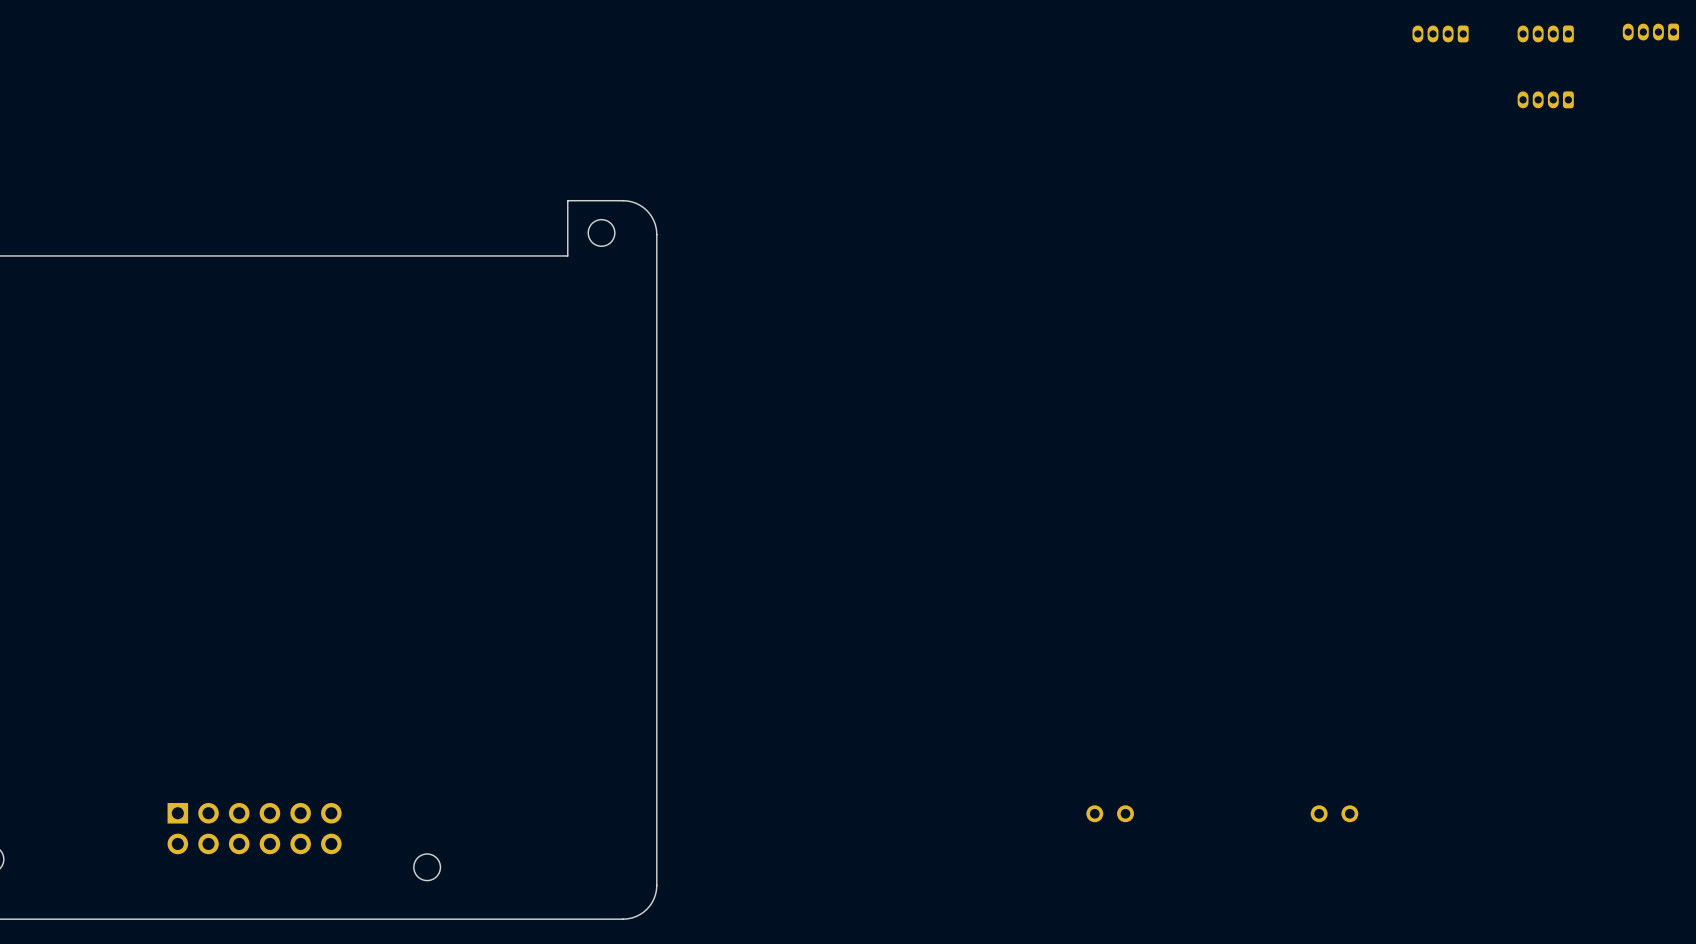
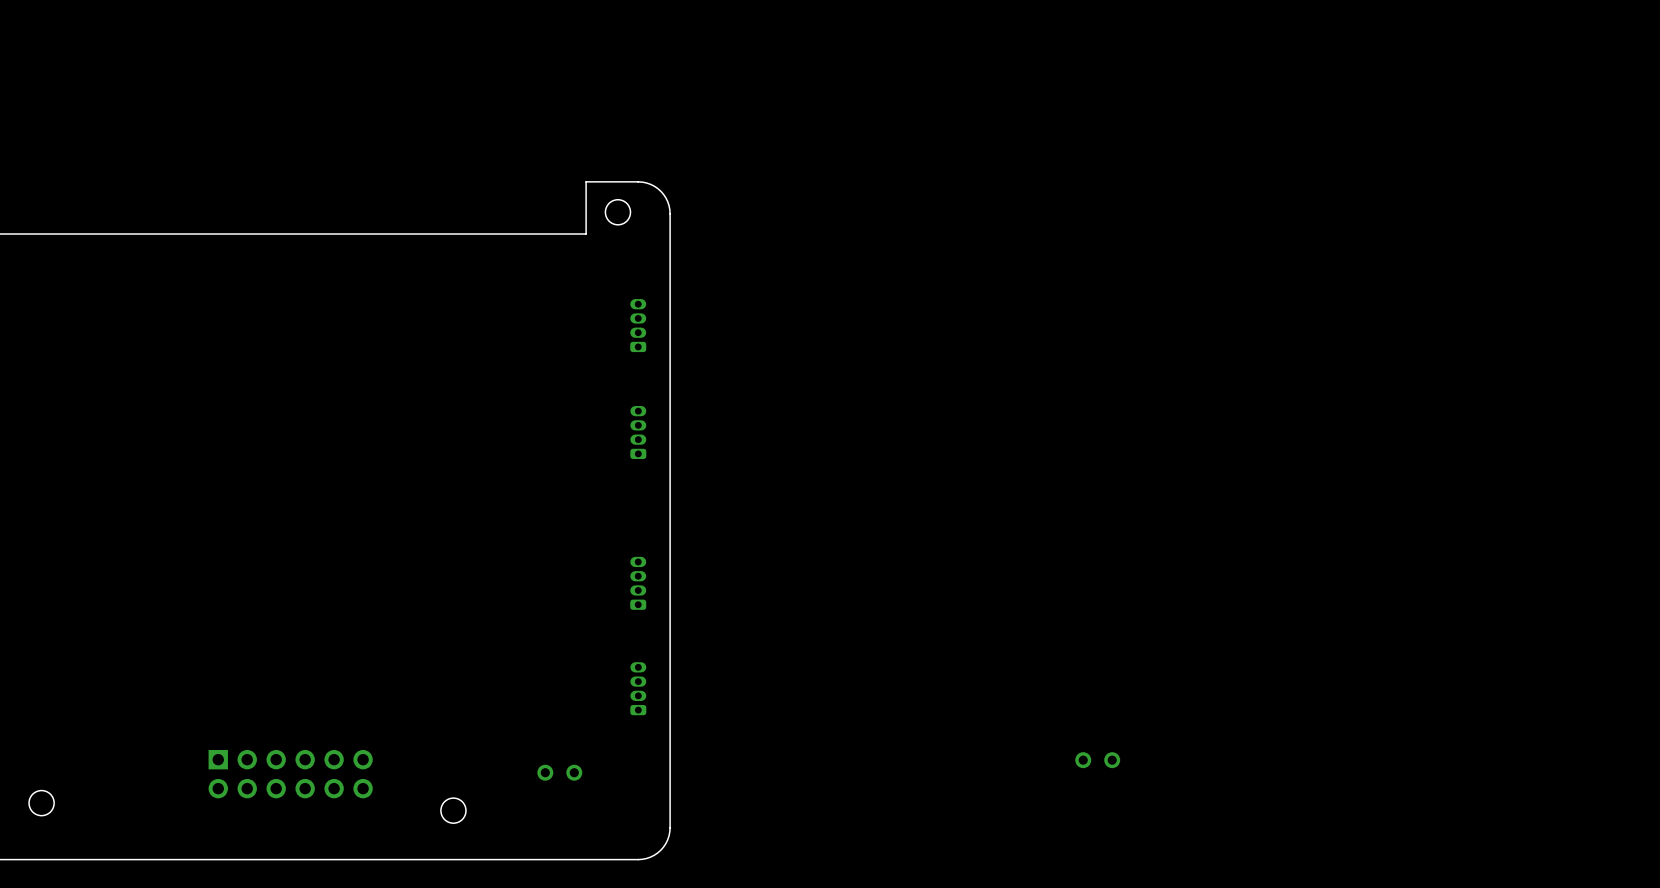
part: (1650, 32) -> none
part: (1440, 33) -> none
part: (1545, 33) -> none
part: (1545, 99) -> none
part: none -> (638, 325)
part: none -> (638, 432)
part: none -> (638, 583)
part: none -> (638, 688)
part: (1334, 813) -> none
part: none -> (559, 772)

